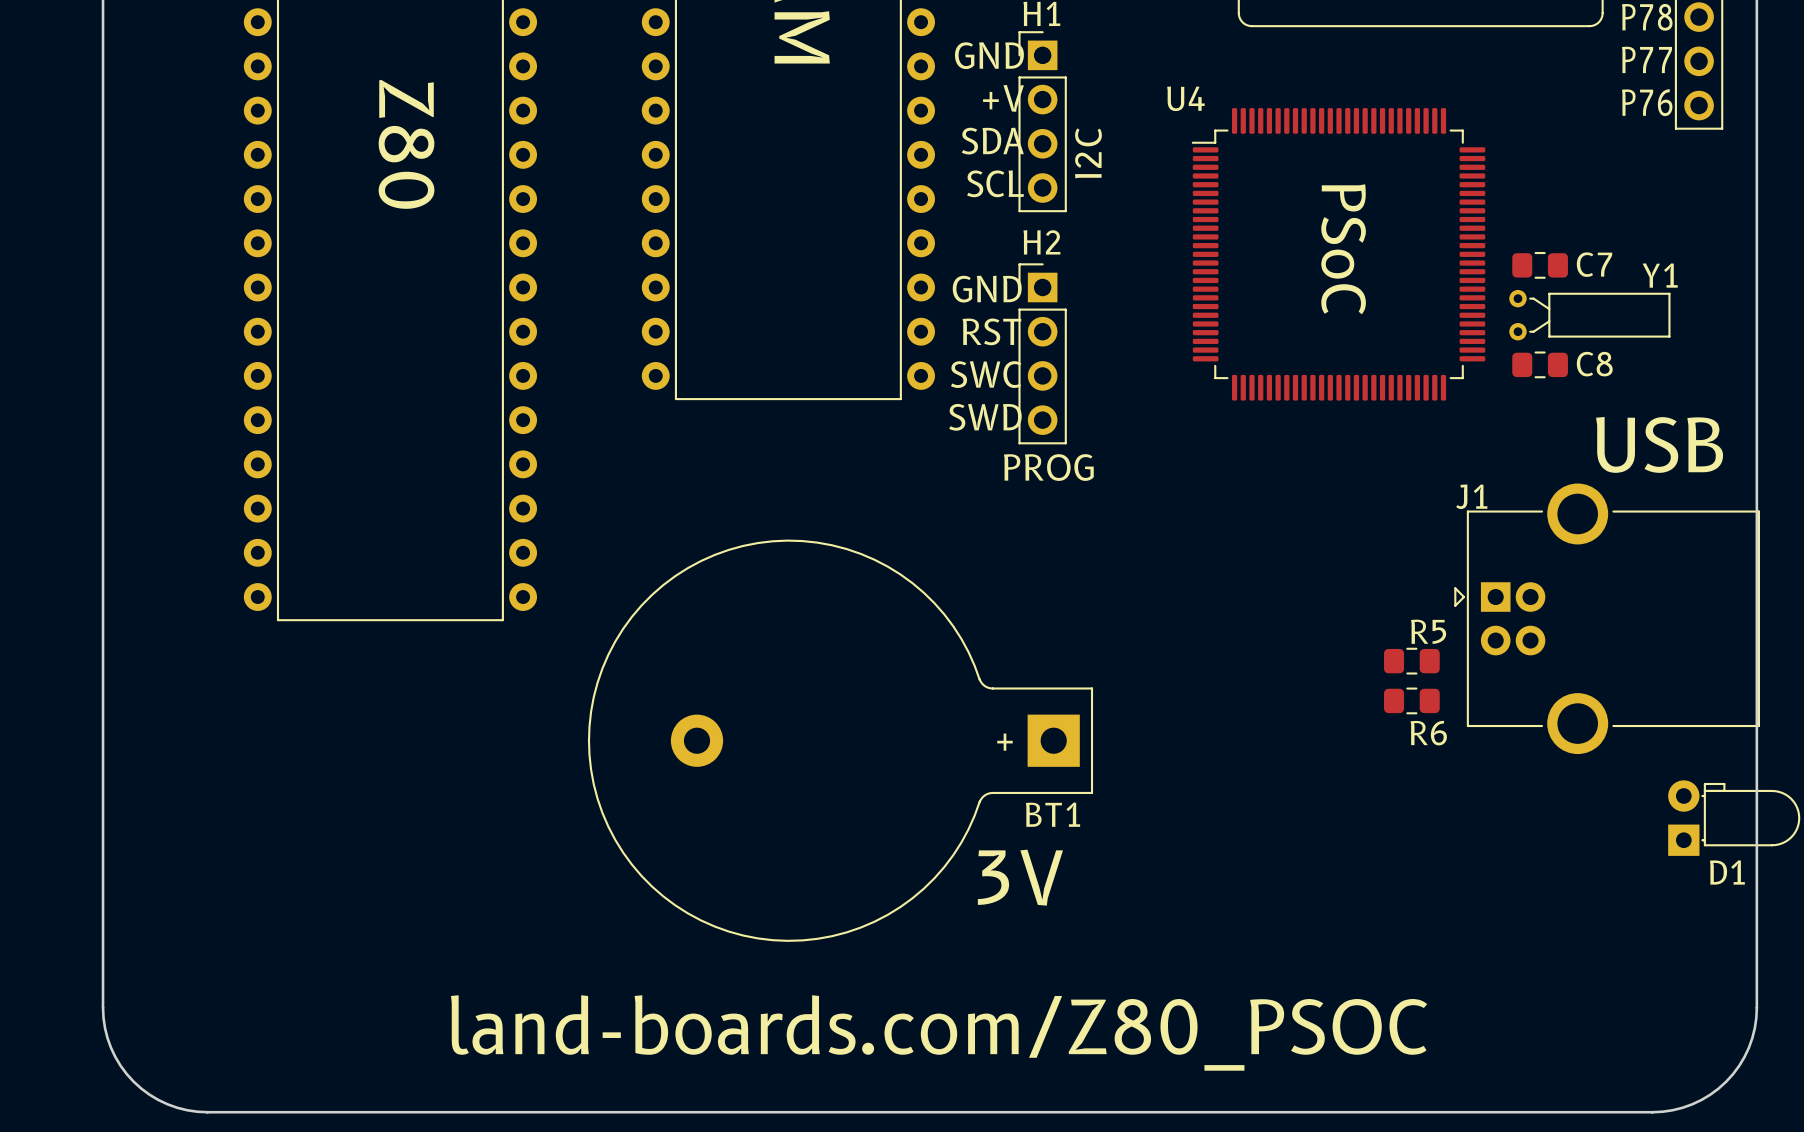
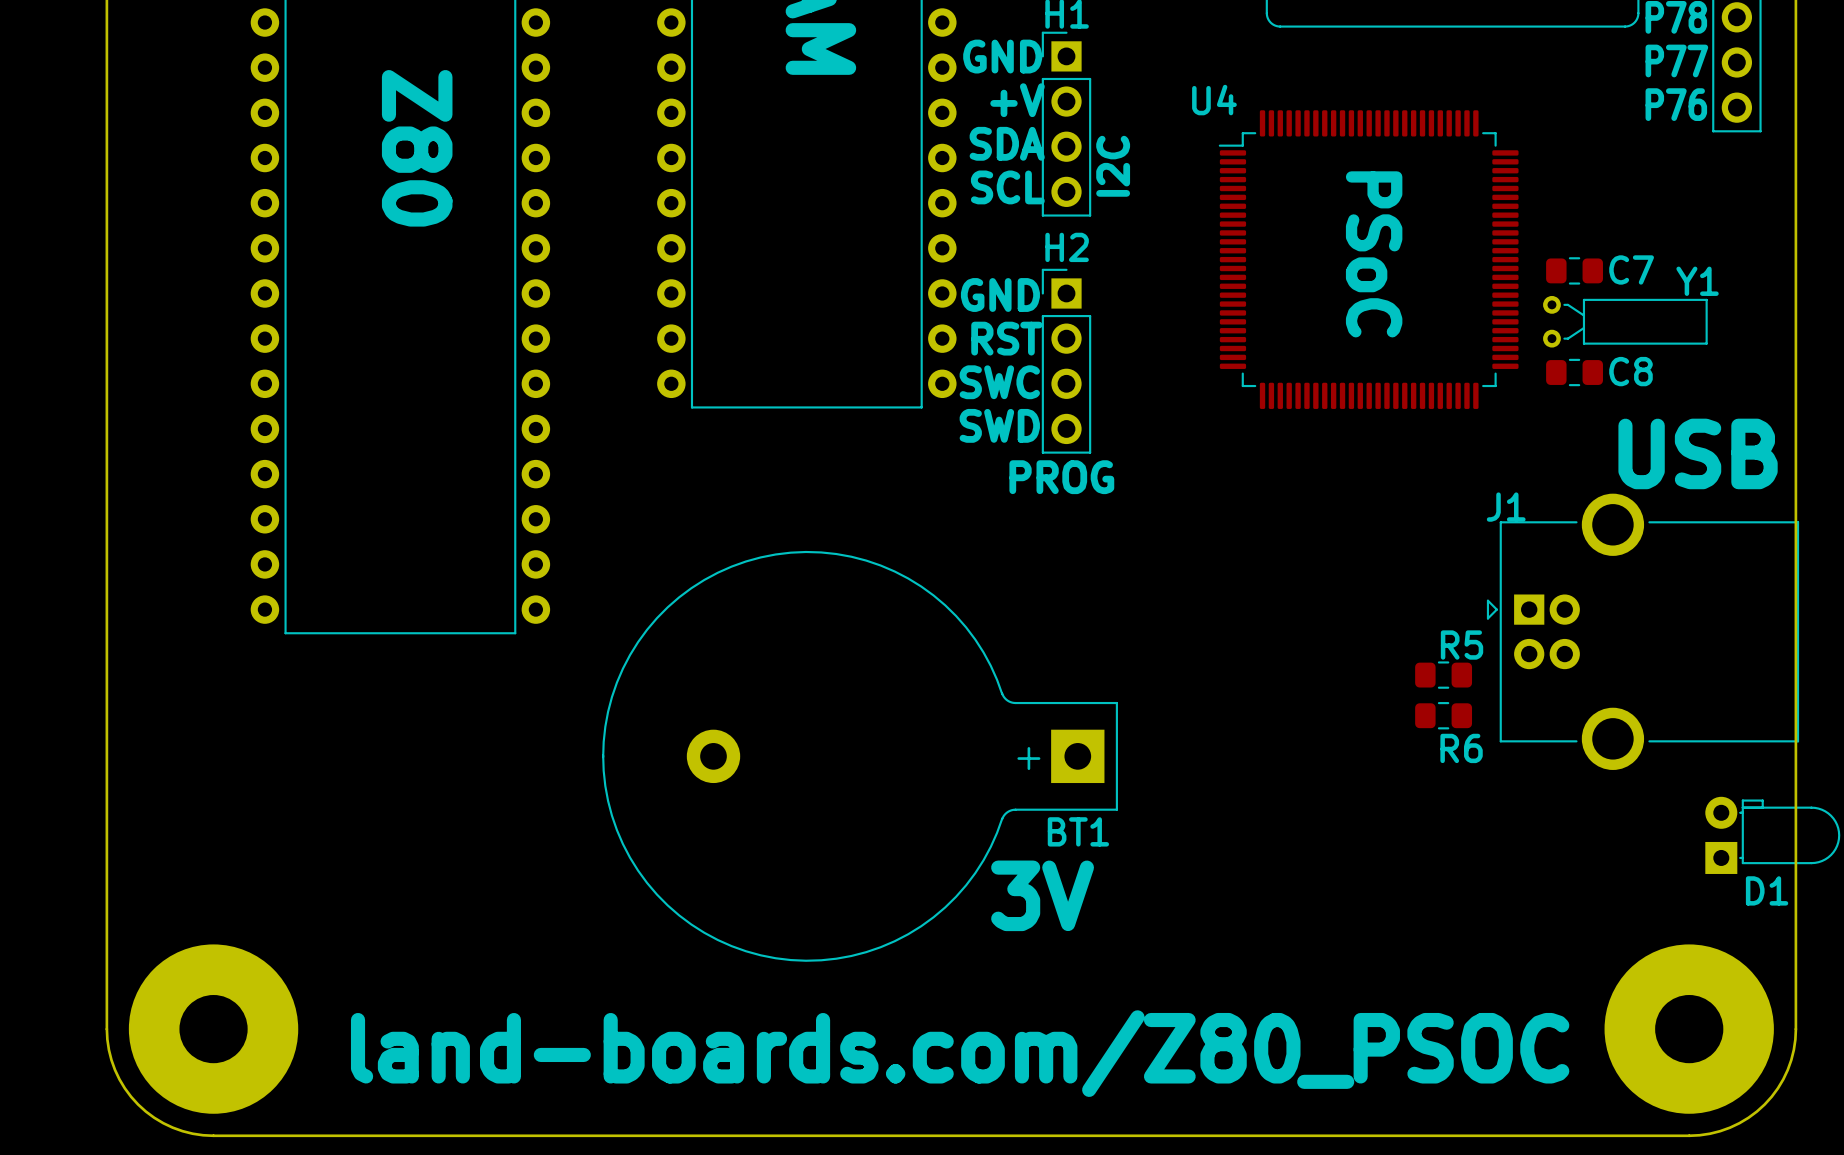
part: none -> (213, 1029)
part: none -> (1689, 1029)

